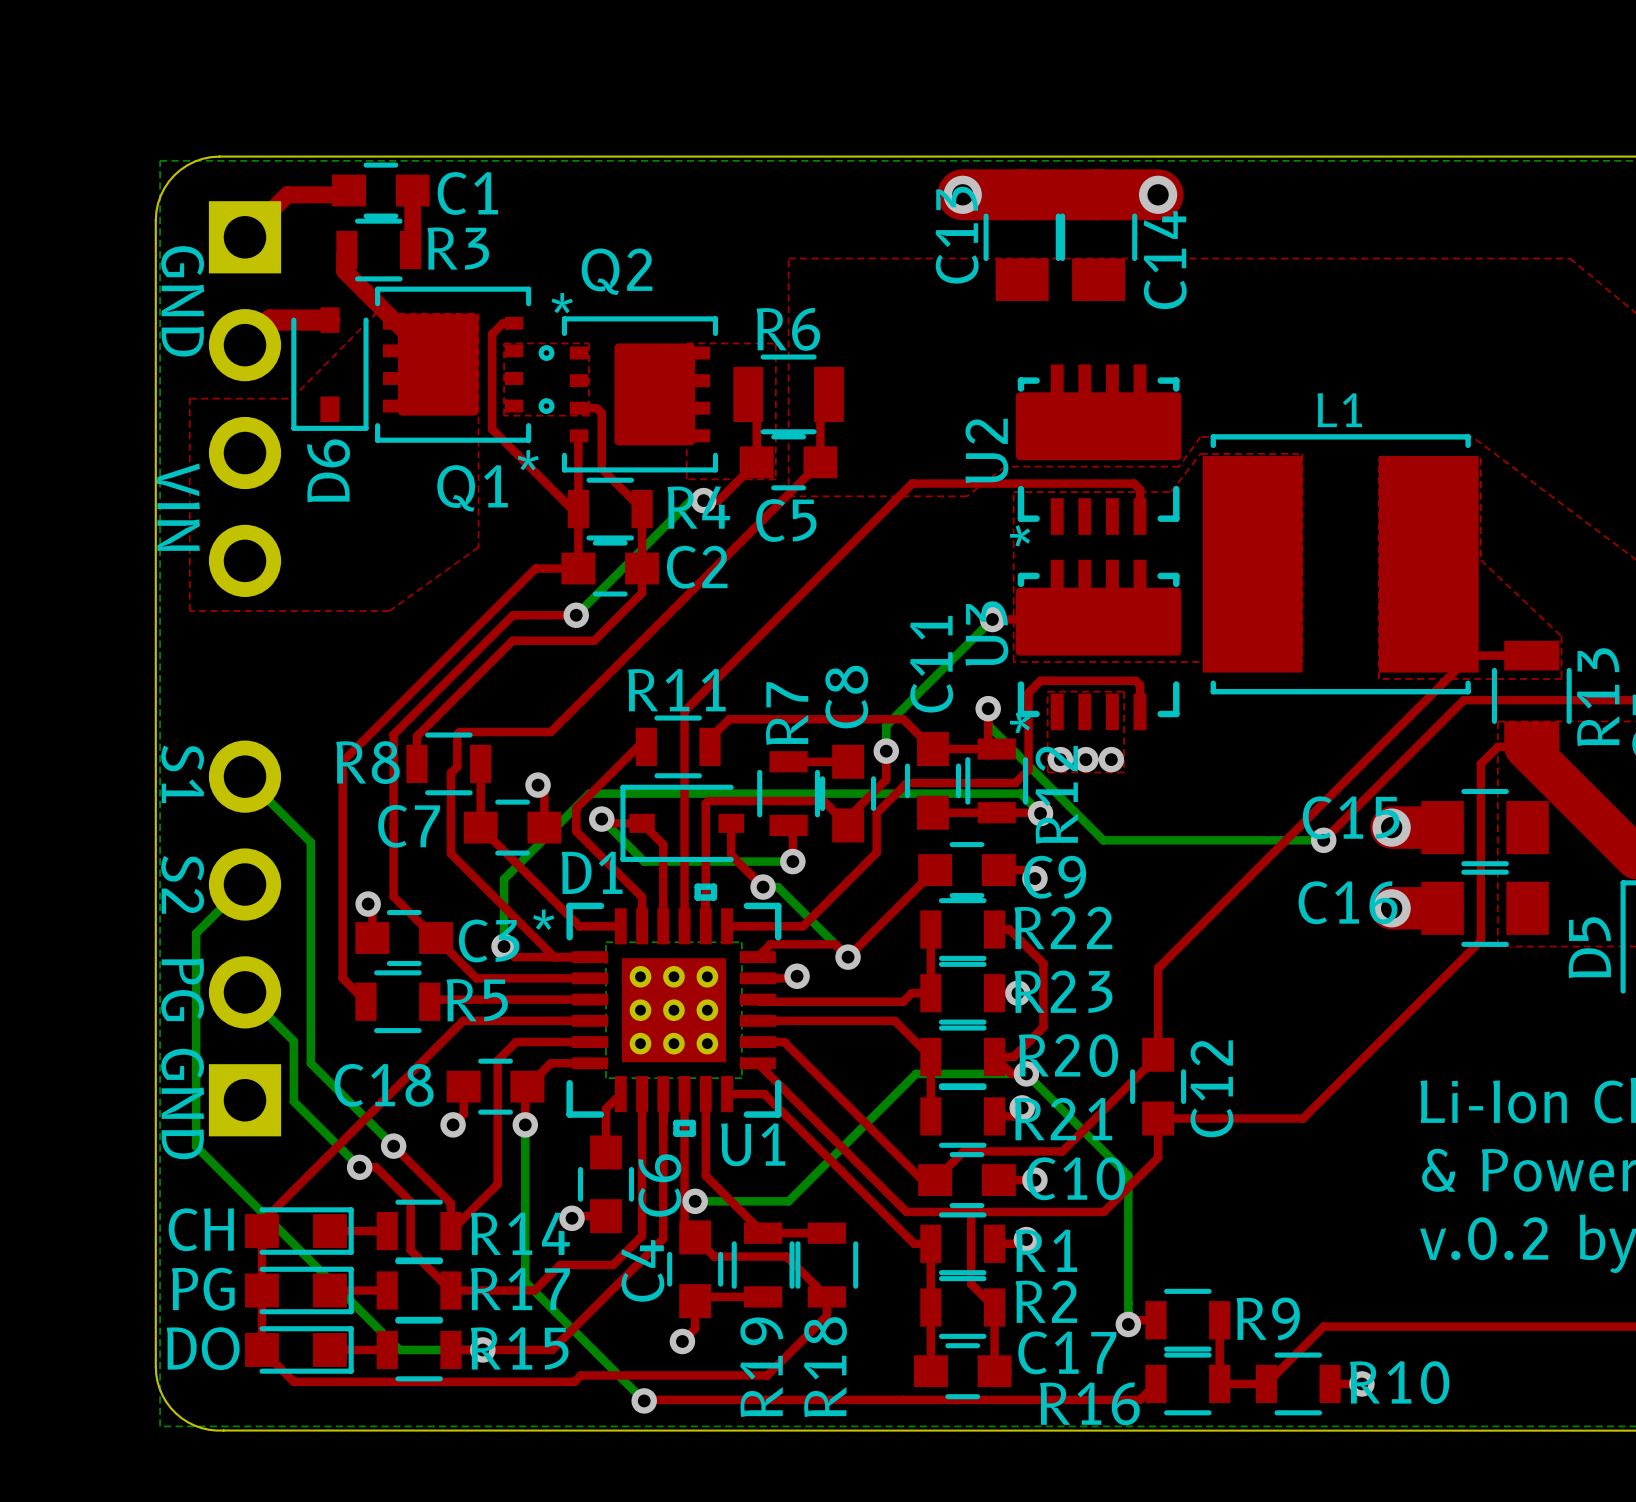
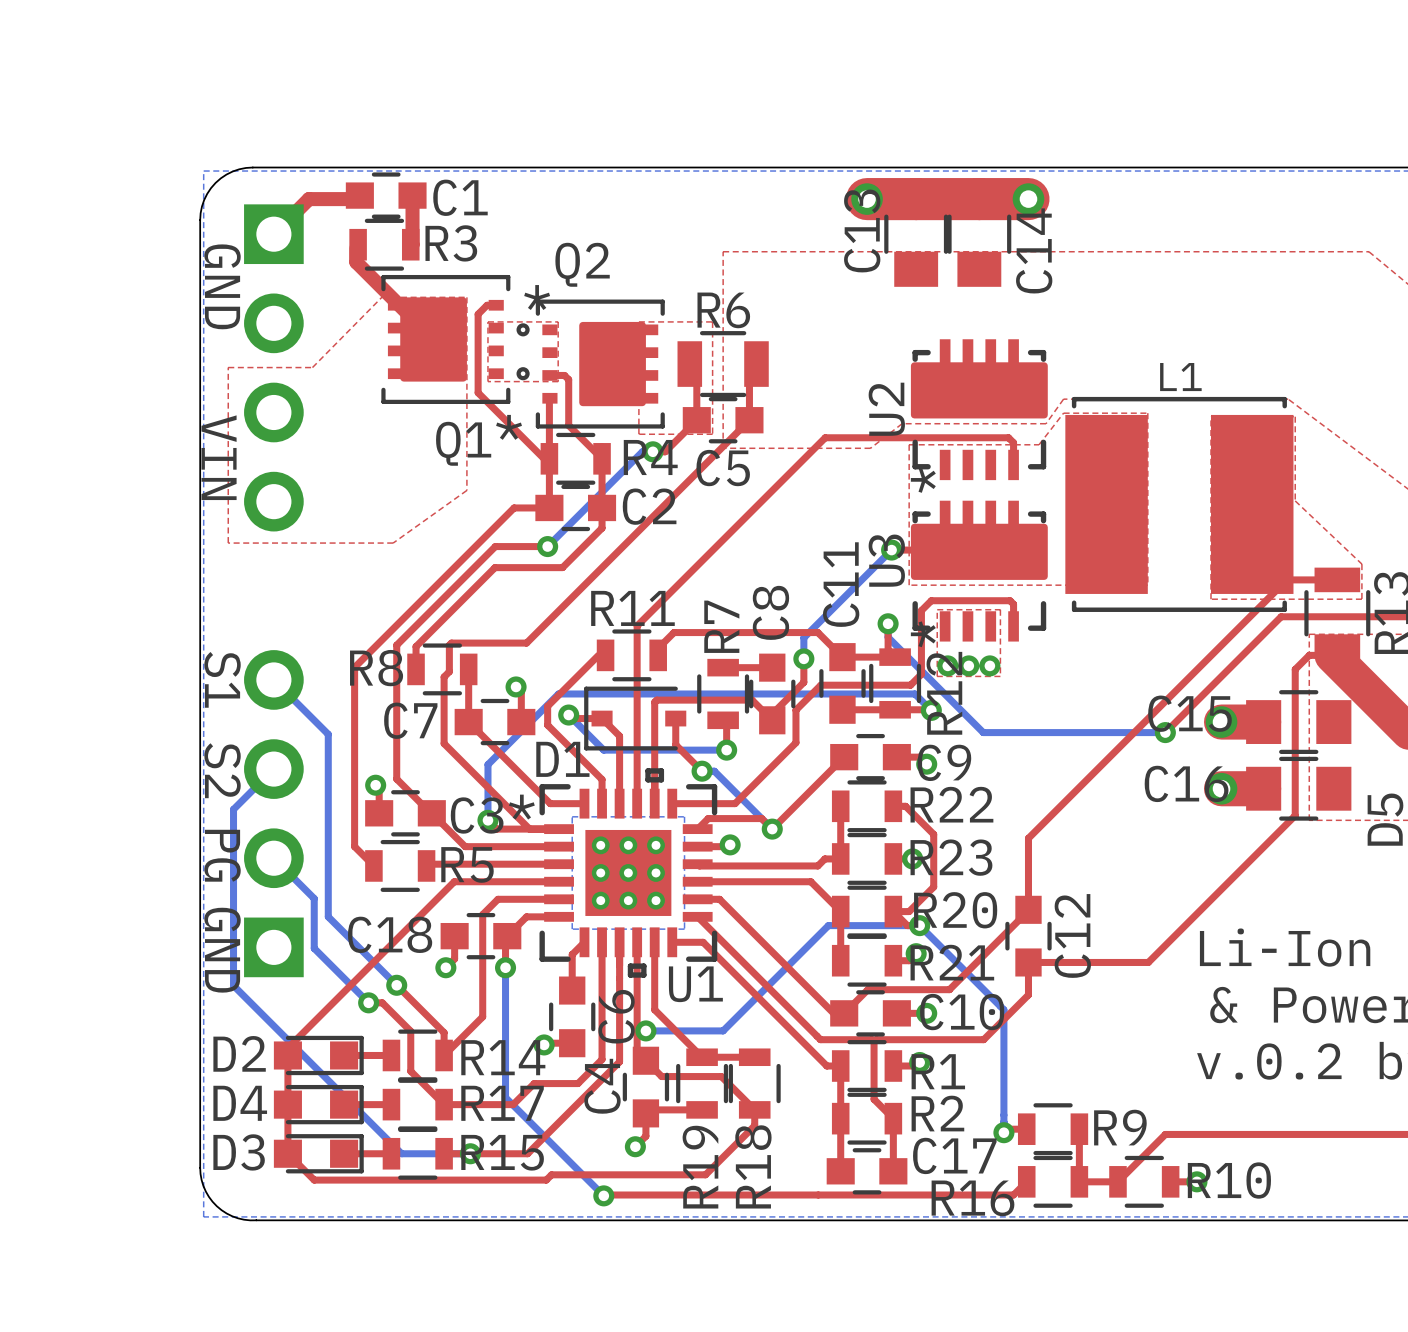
top track: (329, 320) (270, 320) (244, 345) -> none
D6: (329, 369) -> none
CH name: CH (201, 1229) -> D2 (239, 1053)
PG name: PG (203, 1289) -> D4 (240, 1103)
DO name: DO (203, 1348) -> D3 (239, 1152)

